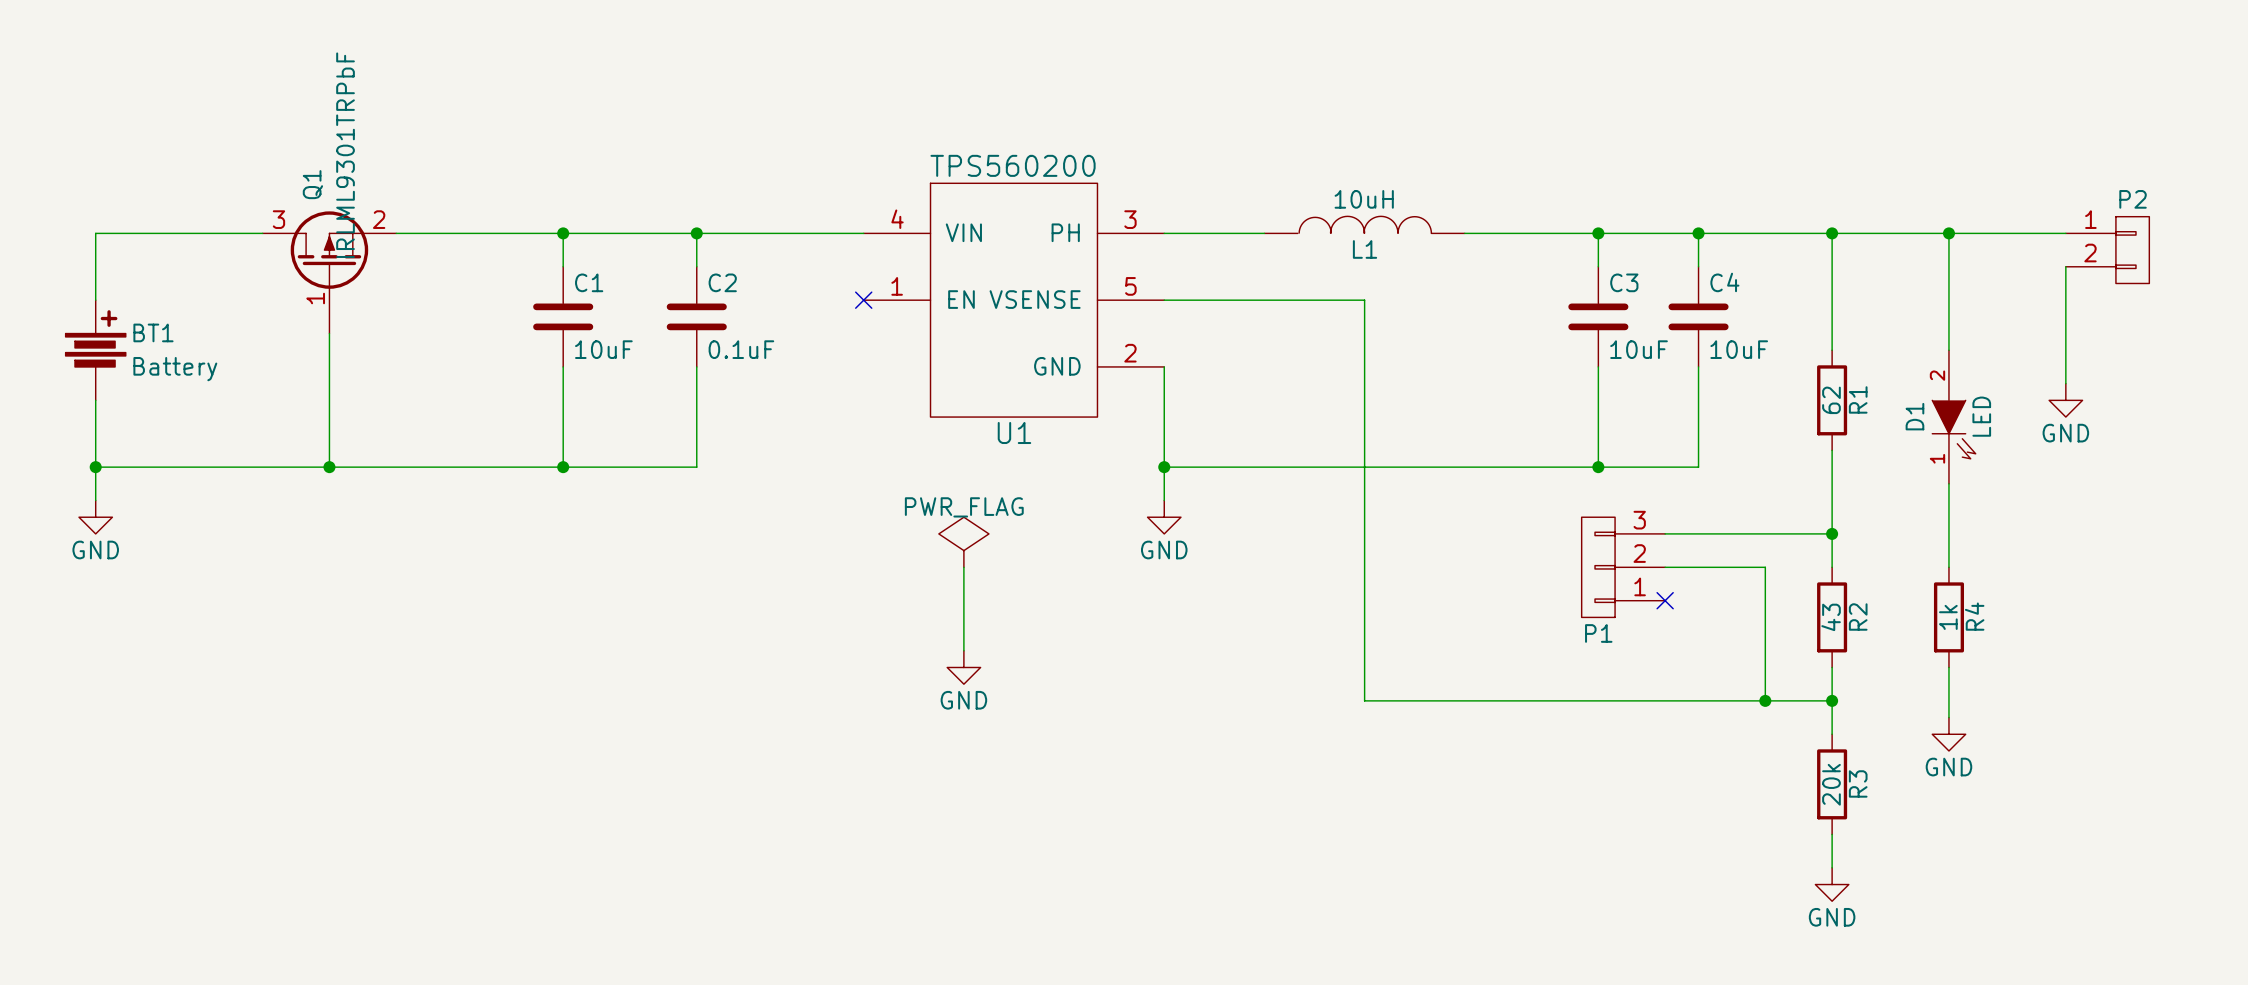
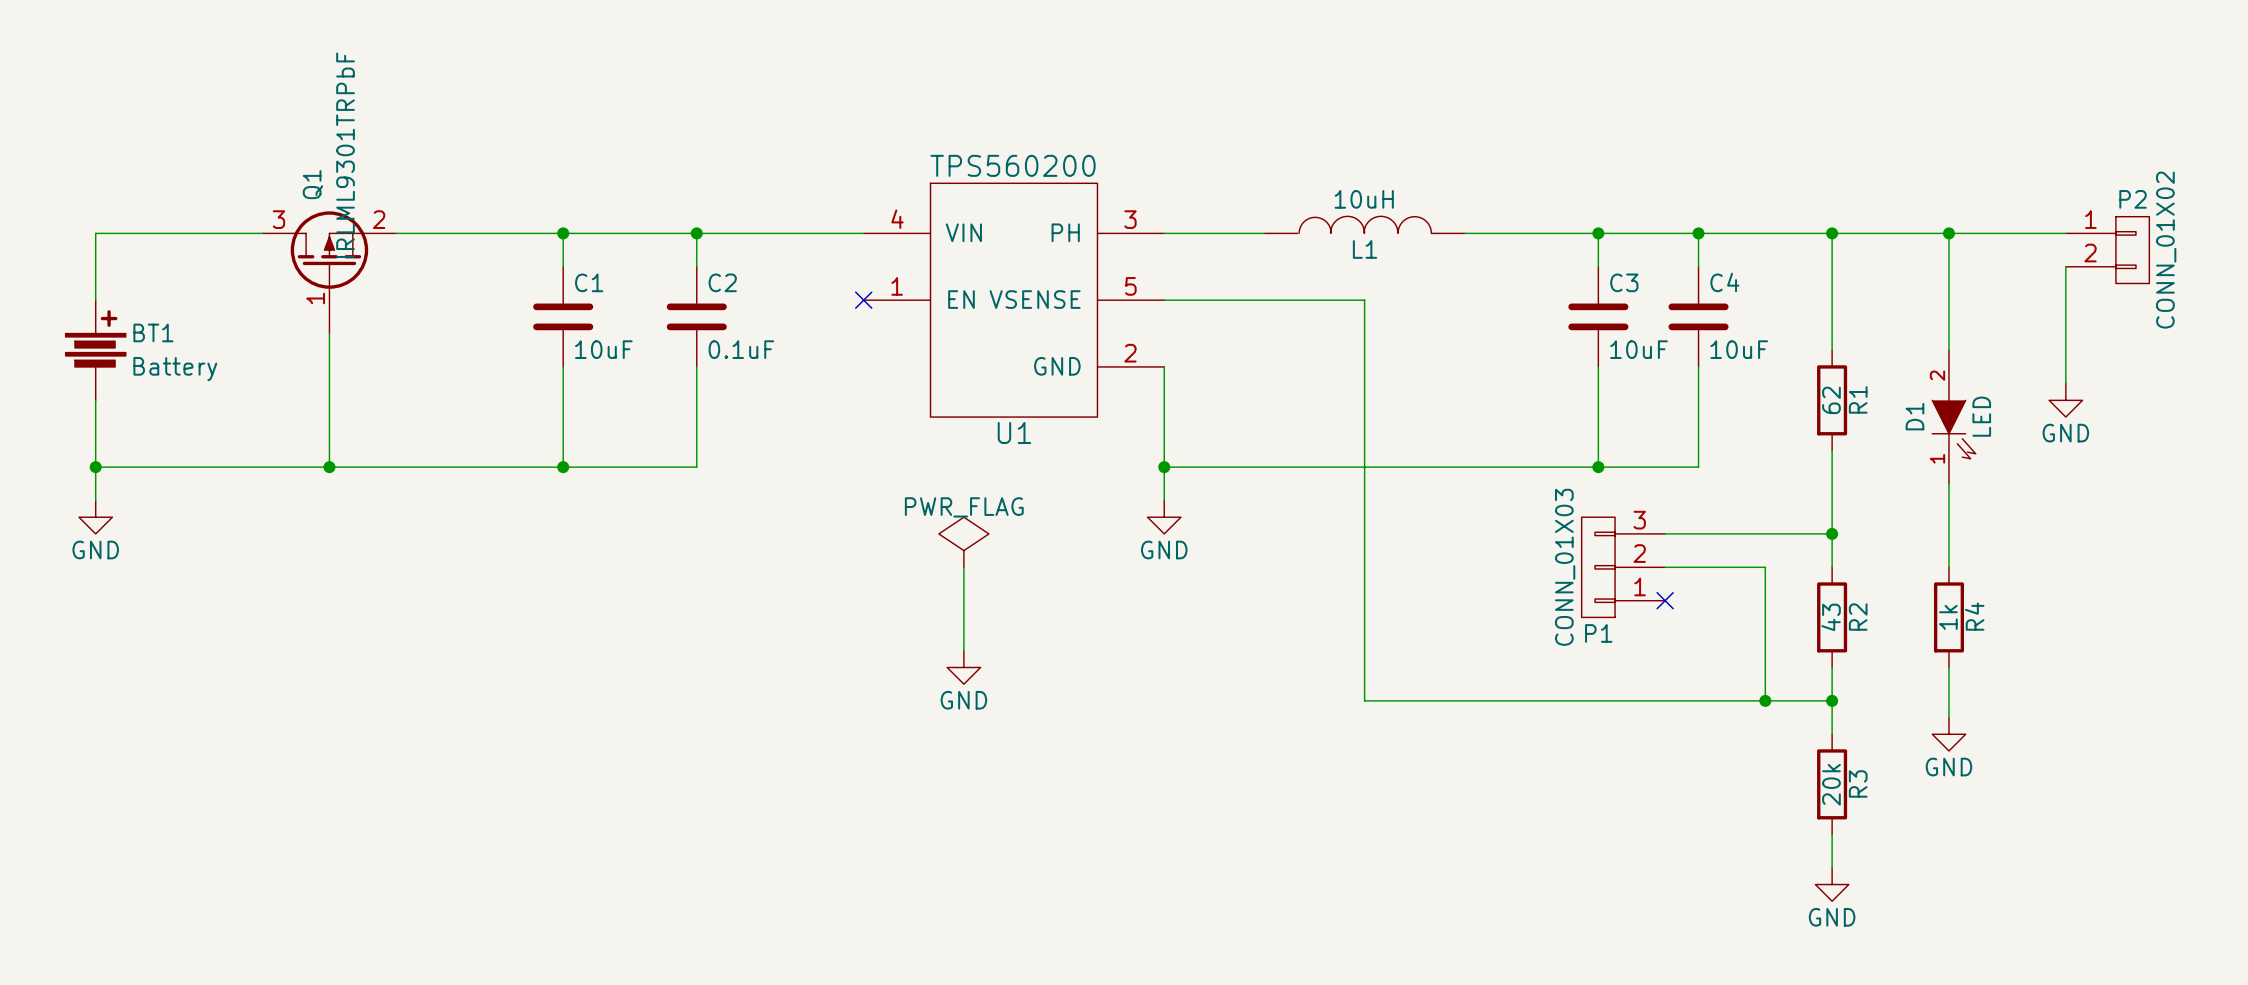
P2 value: none -> CONN_01X02 (2166, 250)
P1 value: none -> CONN_01X03 (1565, 567)

